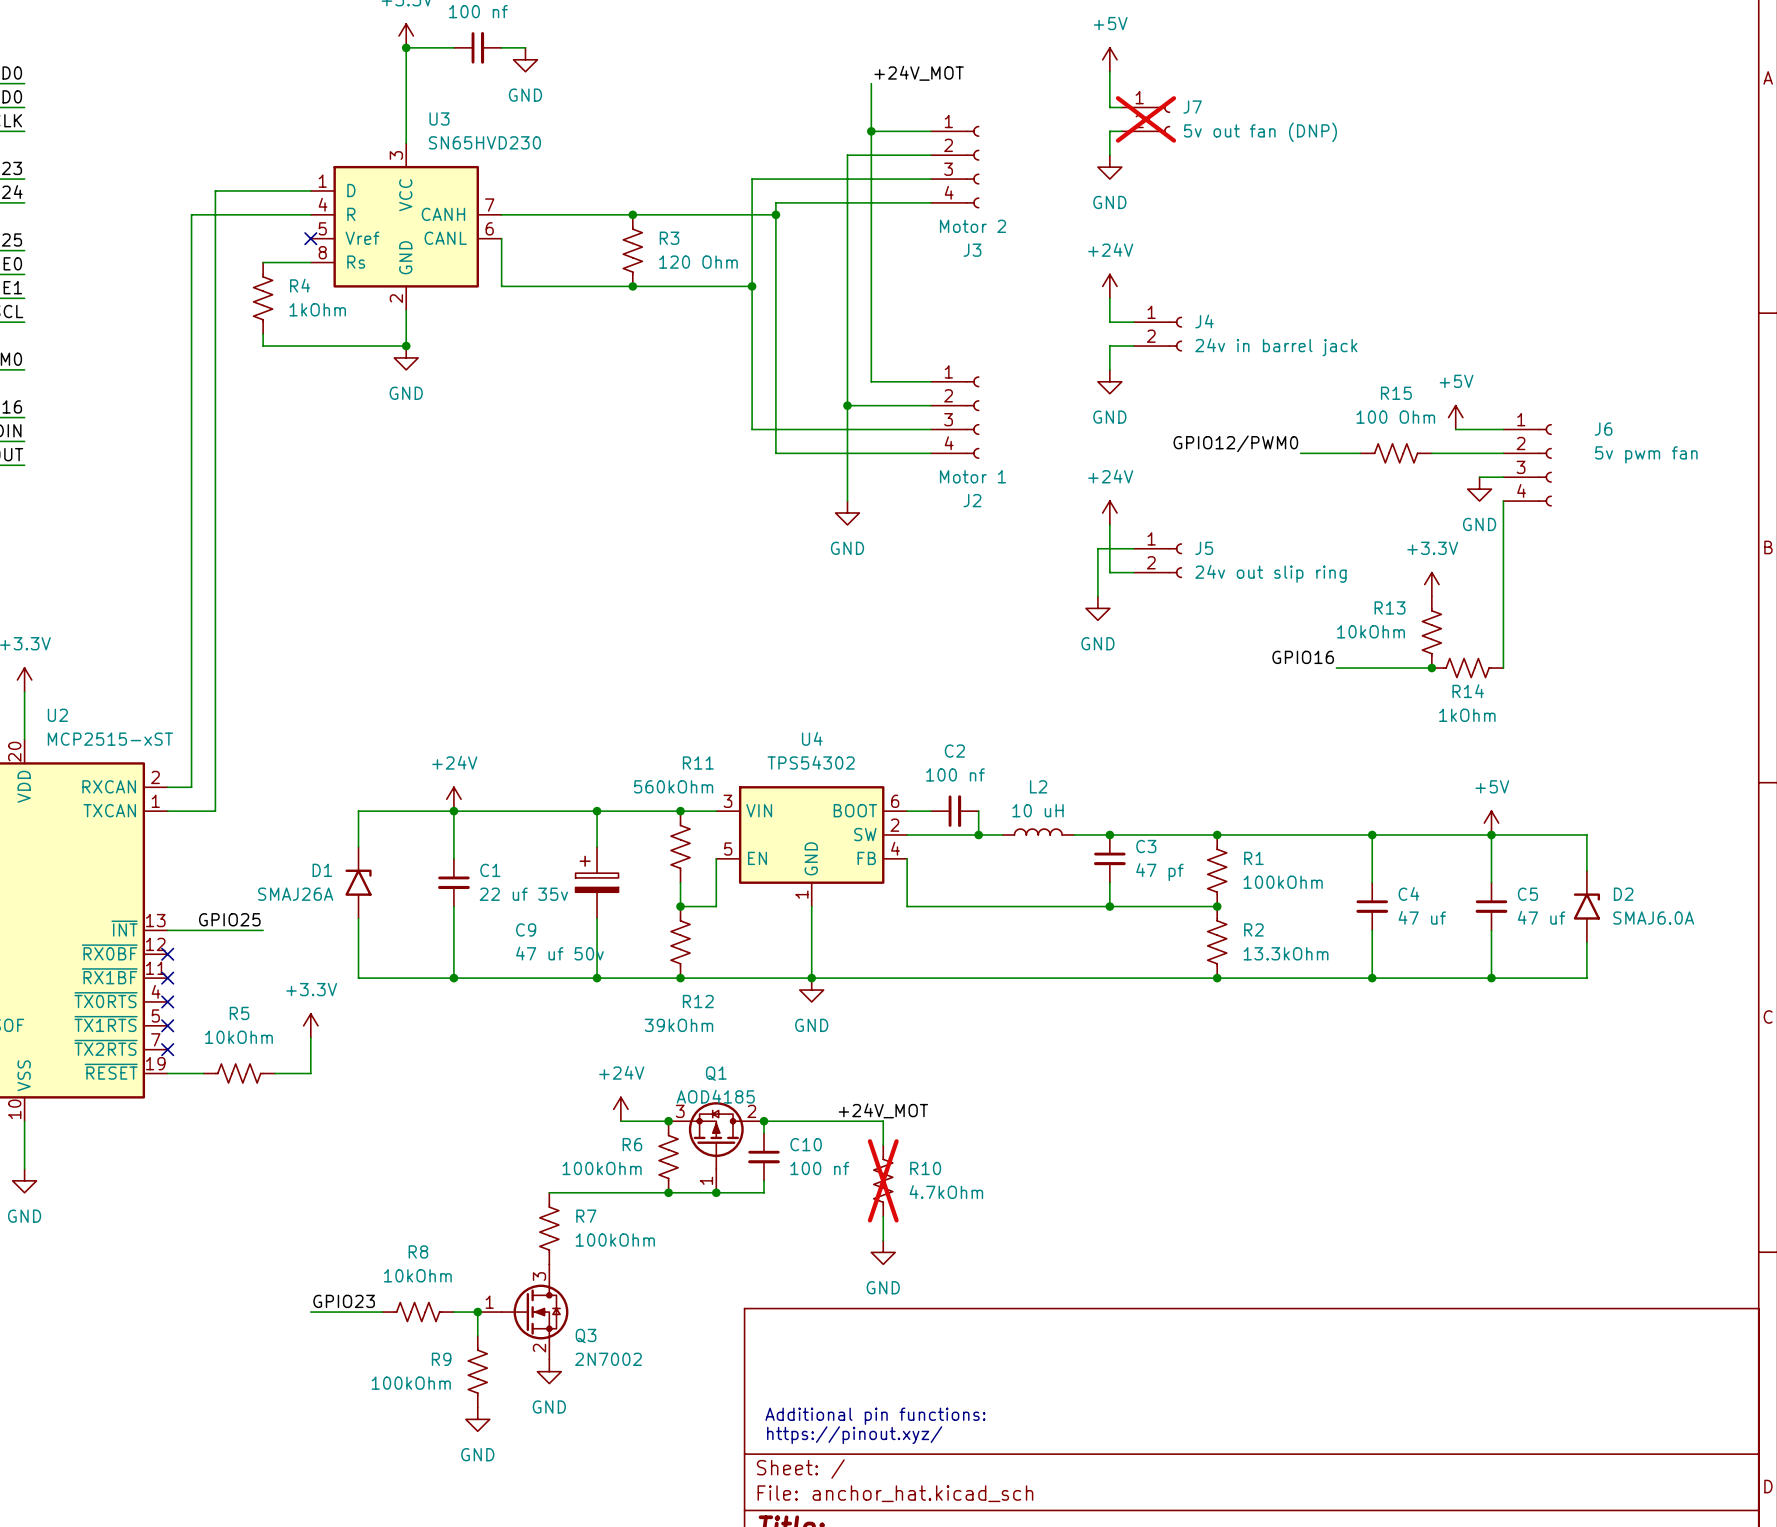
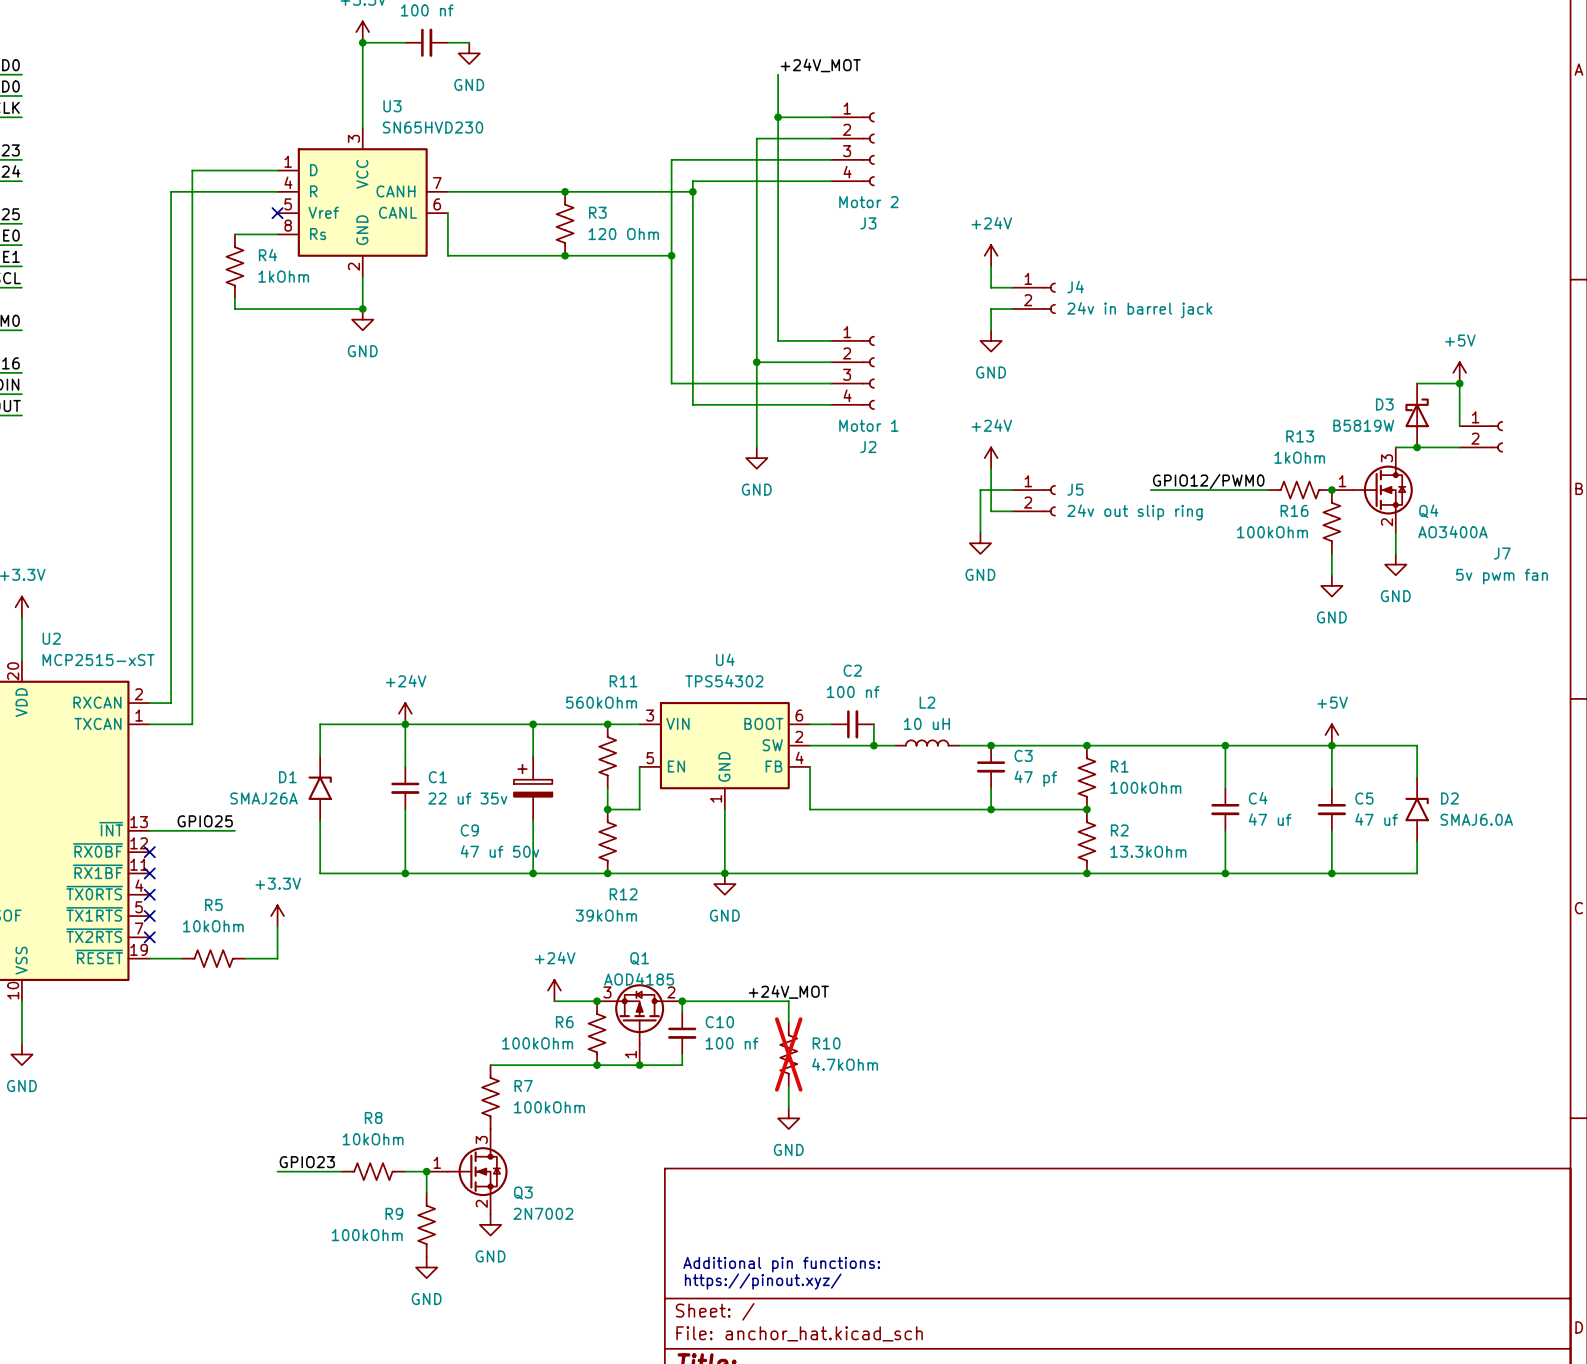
power symbol: +5V (1109, 59) -> none
wire: (1109, 71) (1109, 107) (1121, 107) -> none
J7 name position: J7 (1192, 107) -> J7 (1502, 553)
J7 position: (1145, 119) -> (1481, 436)
J7 do-not-place cross: (1145, 119) -> none
wire: (1121, 131) (1109, 131) (1109, 155) -> none
J7 value: 5v out fan (DNP) (1260, 132) -> 5v pwm fan (1502, 576)
power symbol: GND (1109, 167) -> none
power symbol position: +5V (1455, 417) -> +5V (1459, 372)
wire: (1455, 429) (1503, 429) -> none
wire: none -> (1417, 383) (1459, 383) (1459, 426)
junction: none -> (1459, 383)
label position: GPIO12/PWM0 (1235, 443) -> GPIO12/PWM0 (1208, 481)
wire: (1300, 453) (1360, 453) -> none
R15: 100 Ohm (1396, 453) -> none
wire: (1431, 453) (1503, 453) -> (1395, 447) (1459, 447)
J6: 5v pwm fan (1527, 465) -> none
D3: none -> B5819W (1417, 415)
wire: (1479, 477) (1503, 477) -> none
power symbol: GND (1479, 489) -> none
wire: (1503, 501) (1503, 668) -> none
junction: none -> (1417, 447)
wire: none -> (1150, 490) (1267, 490)
junction: none -> (1331, 490)
Q4: none -> AO3400A (1372, 490)
power symbol: +3.3V (1431, 584) -> none
R16: none -> 100kOhm (1331, 521)
wire: none -> (1395, 532) (1395, 553)
R13 name position: R13 (1390, 607) -> R13 (1300, 436)
wire: none -> (1331, 553) (1331, 575)
R13 value: 10kOhm (1371, 631) -> 1kOhm (1299, 457)
R13 rotation: 0° (1431, 632) -> 90° clockwise (1299, 490)
R13 position: (1431, 632) -> (1299, 490)
power symbol: none -> GND (1395, 564)
power symbol: none -> GND (1331, 585)
label: GPIO16 (1303, 657) -> none
wire: (1336, 668) (1431, 668) -> none
junction: (1431, 668) -> none
R14: 1kOhm (1467, 668) -> none

